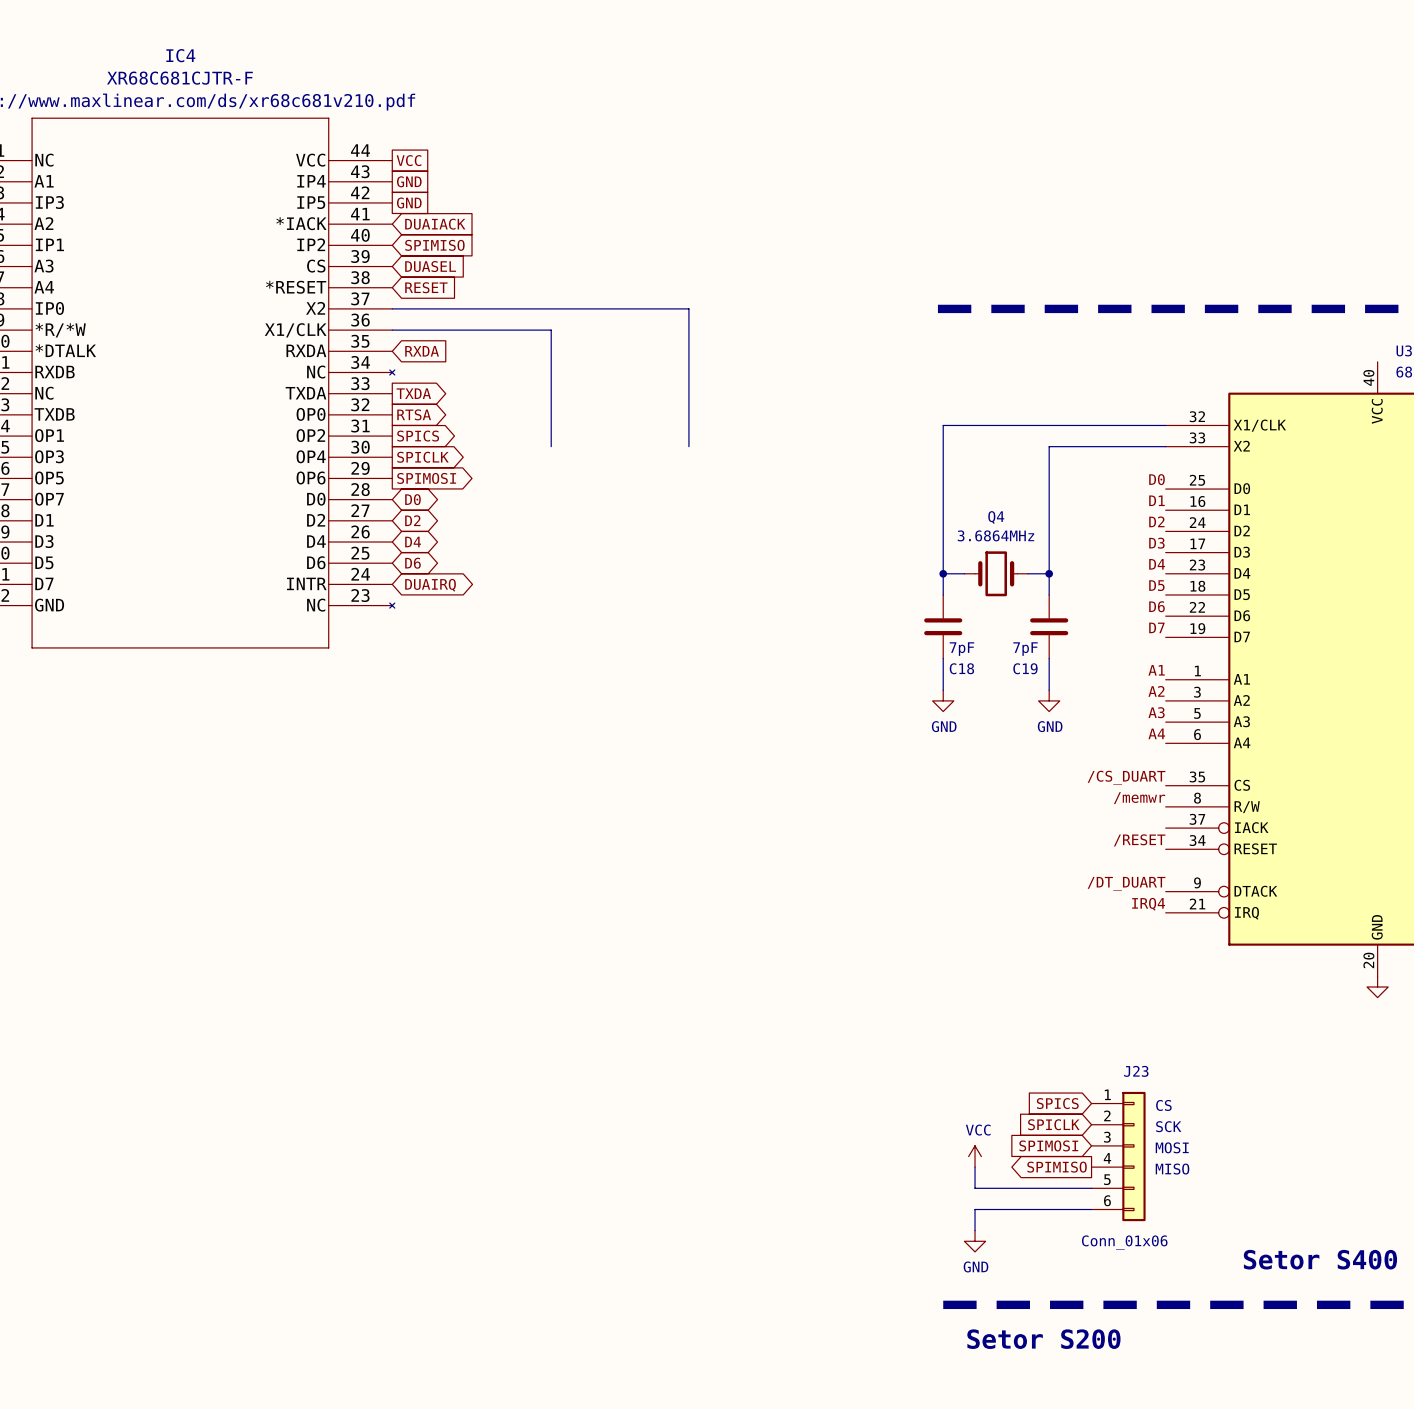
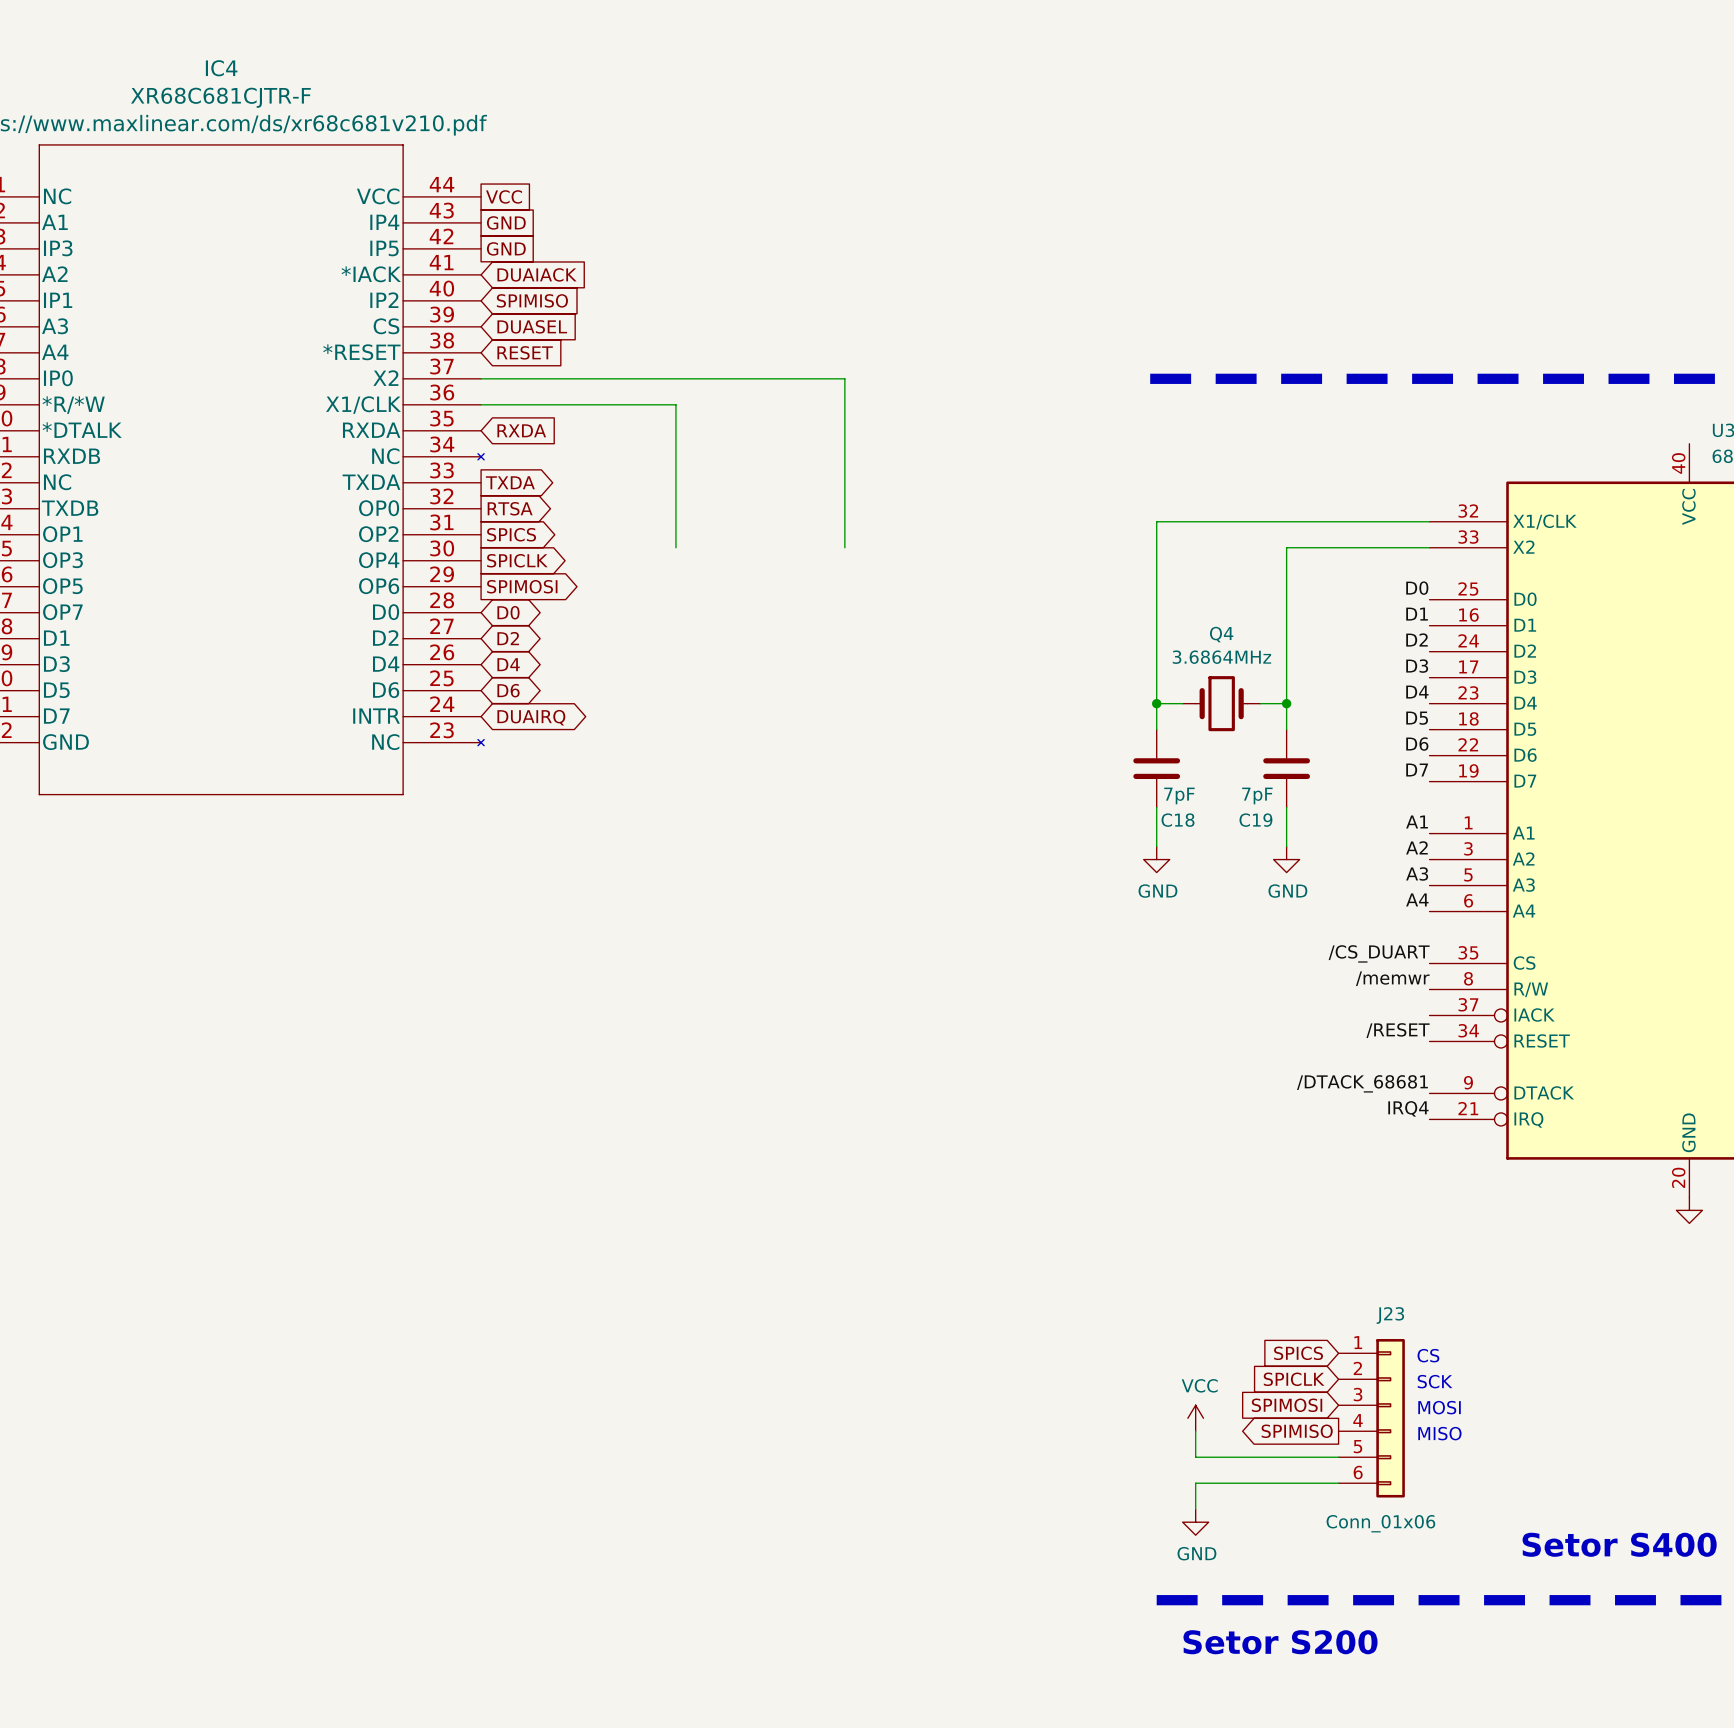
label: /DT_DUART (1126, 883) -> /DTACK_68681 (1362, 1083)

